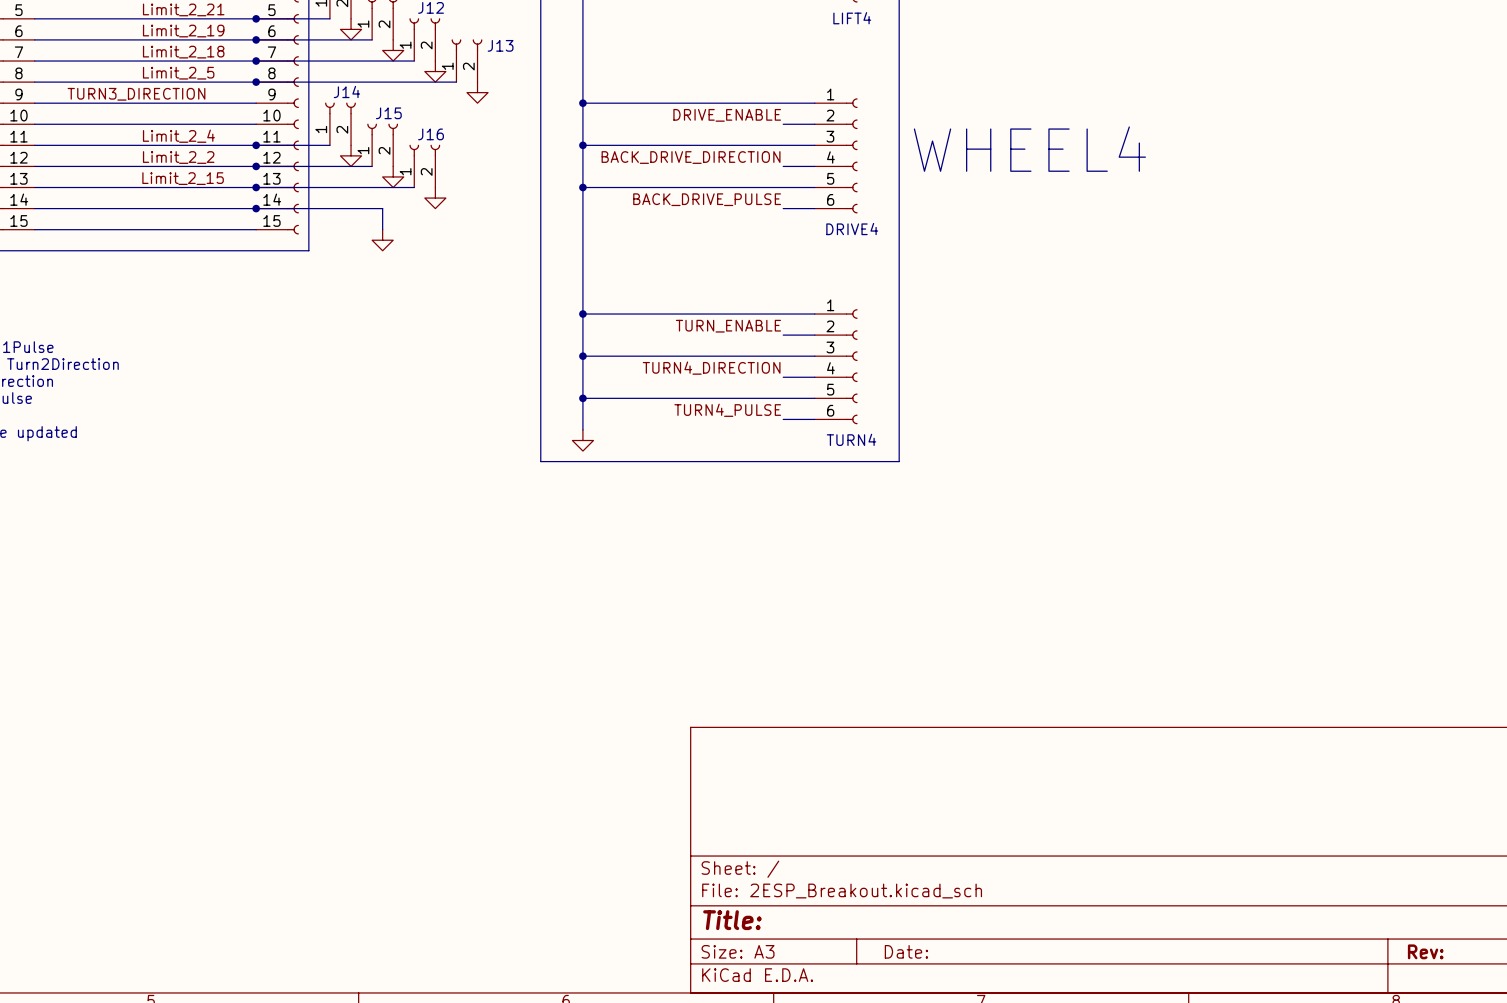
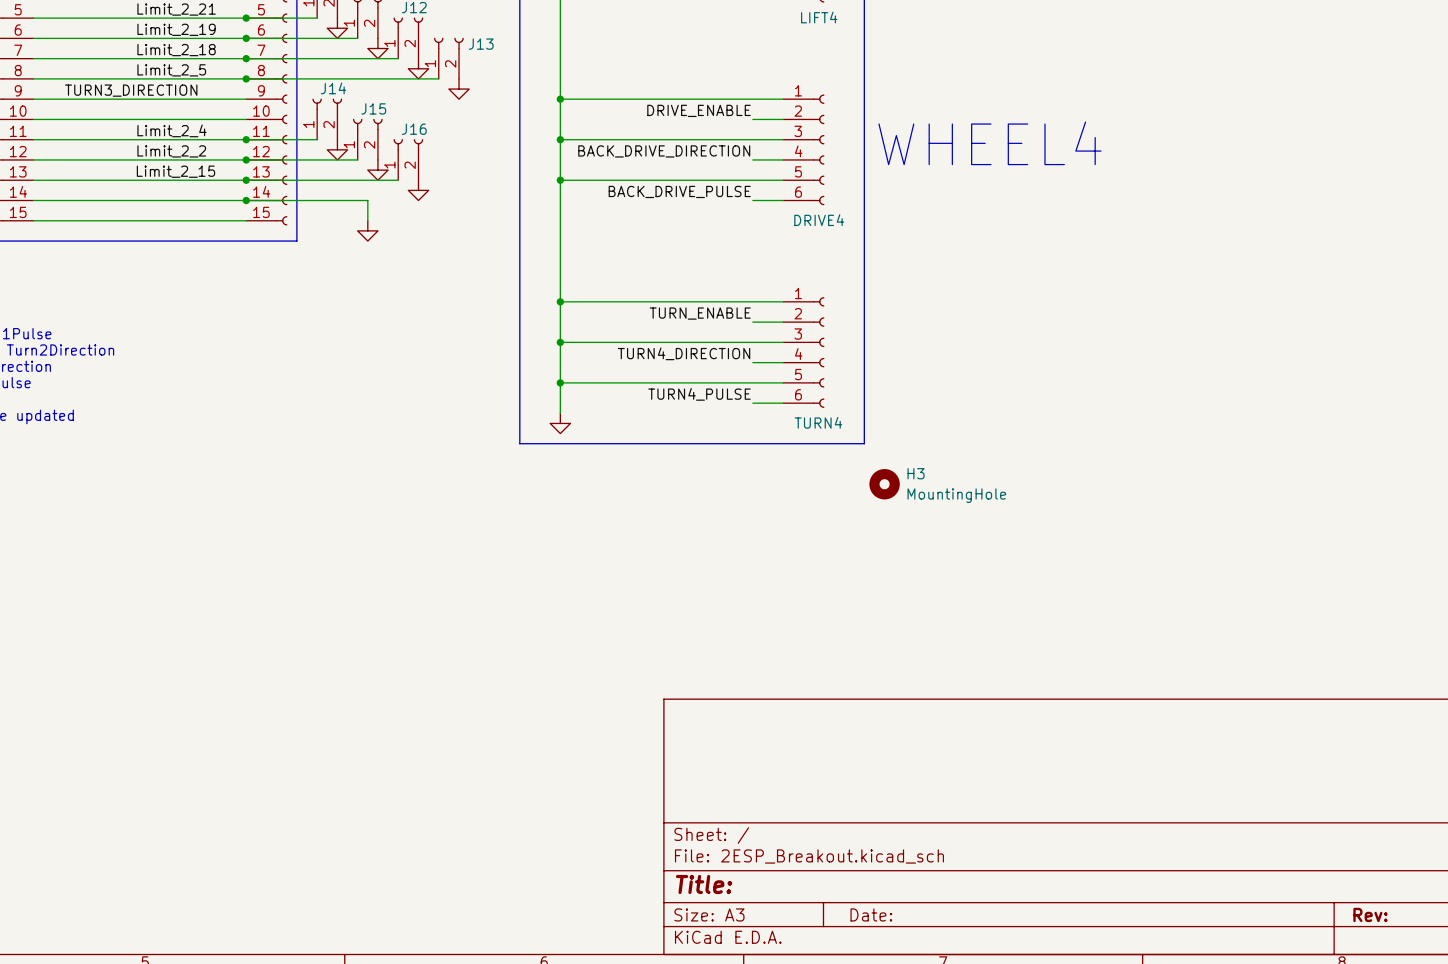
H3: none -> MountingHole (884, 484)

